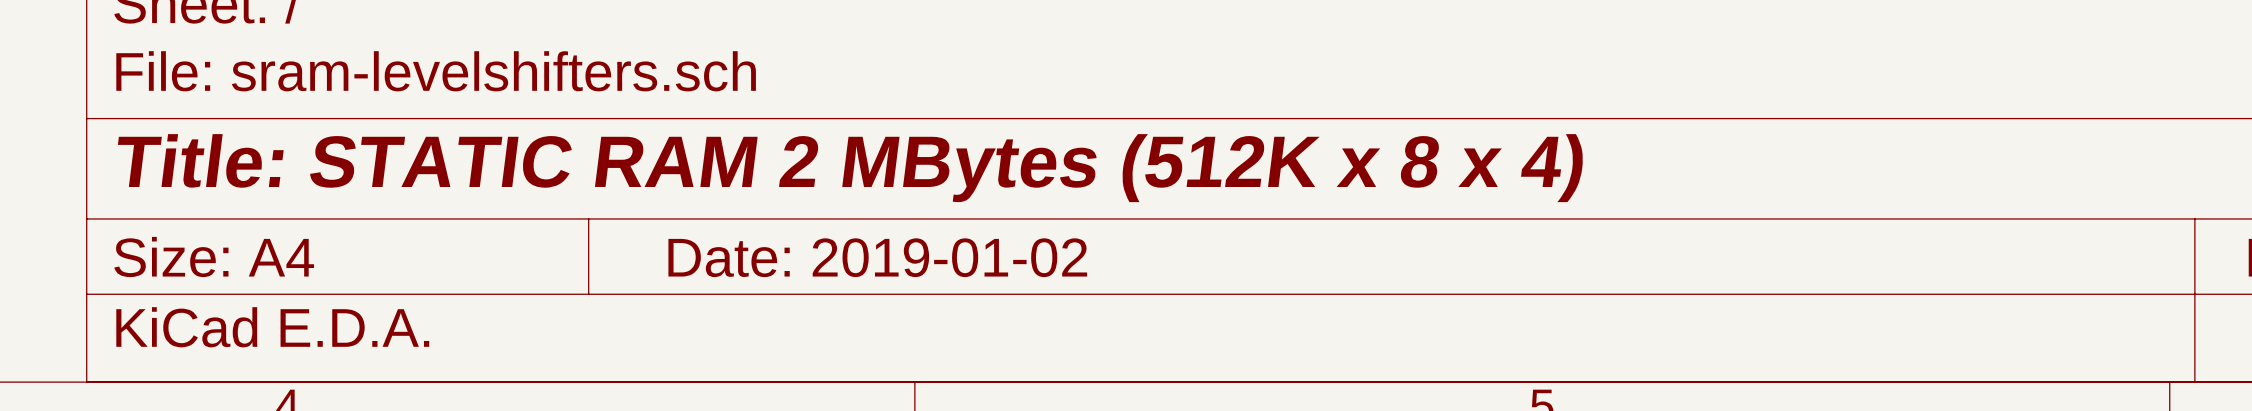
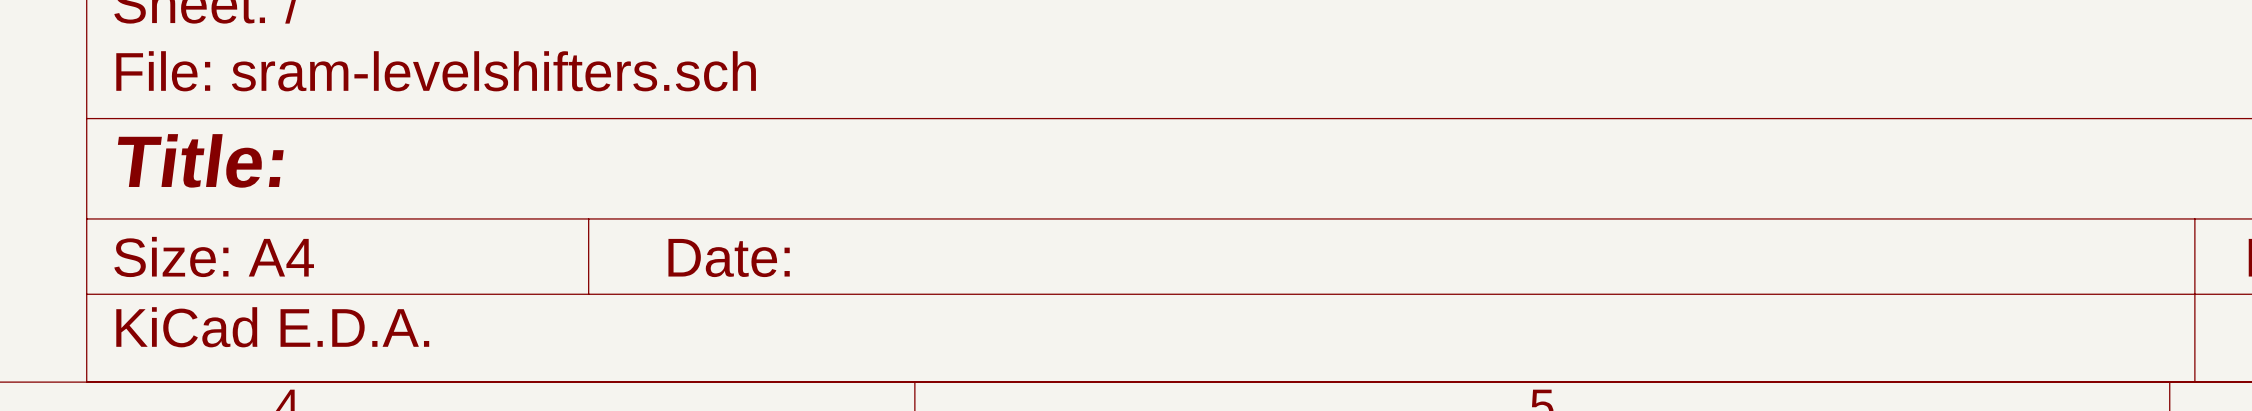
title block: Title: STATIC RAM 2 MBytes (512K x 8 x 4) (850, 168) -> Title: (200, 160)
title block: Date: 2019-01-02 (877, 257) -> Date: (729, 257)

